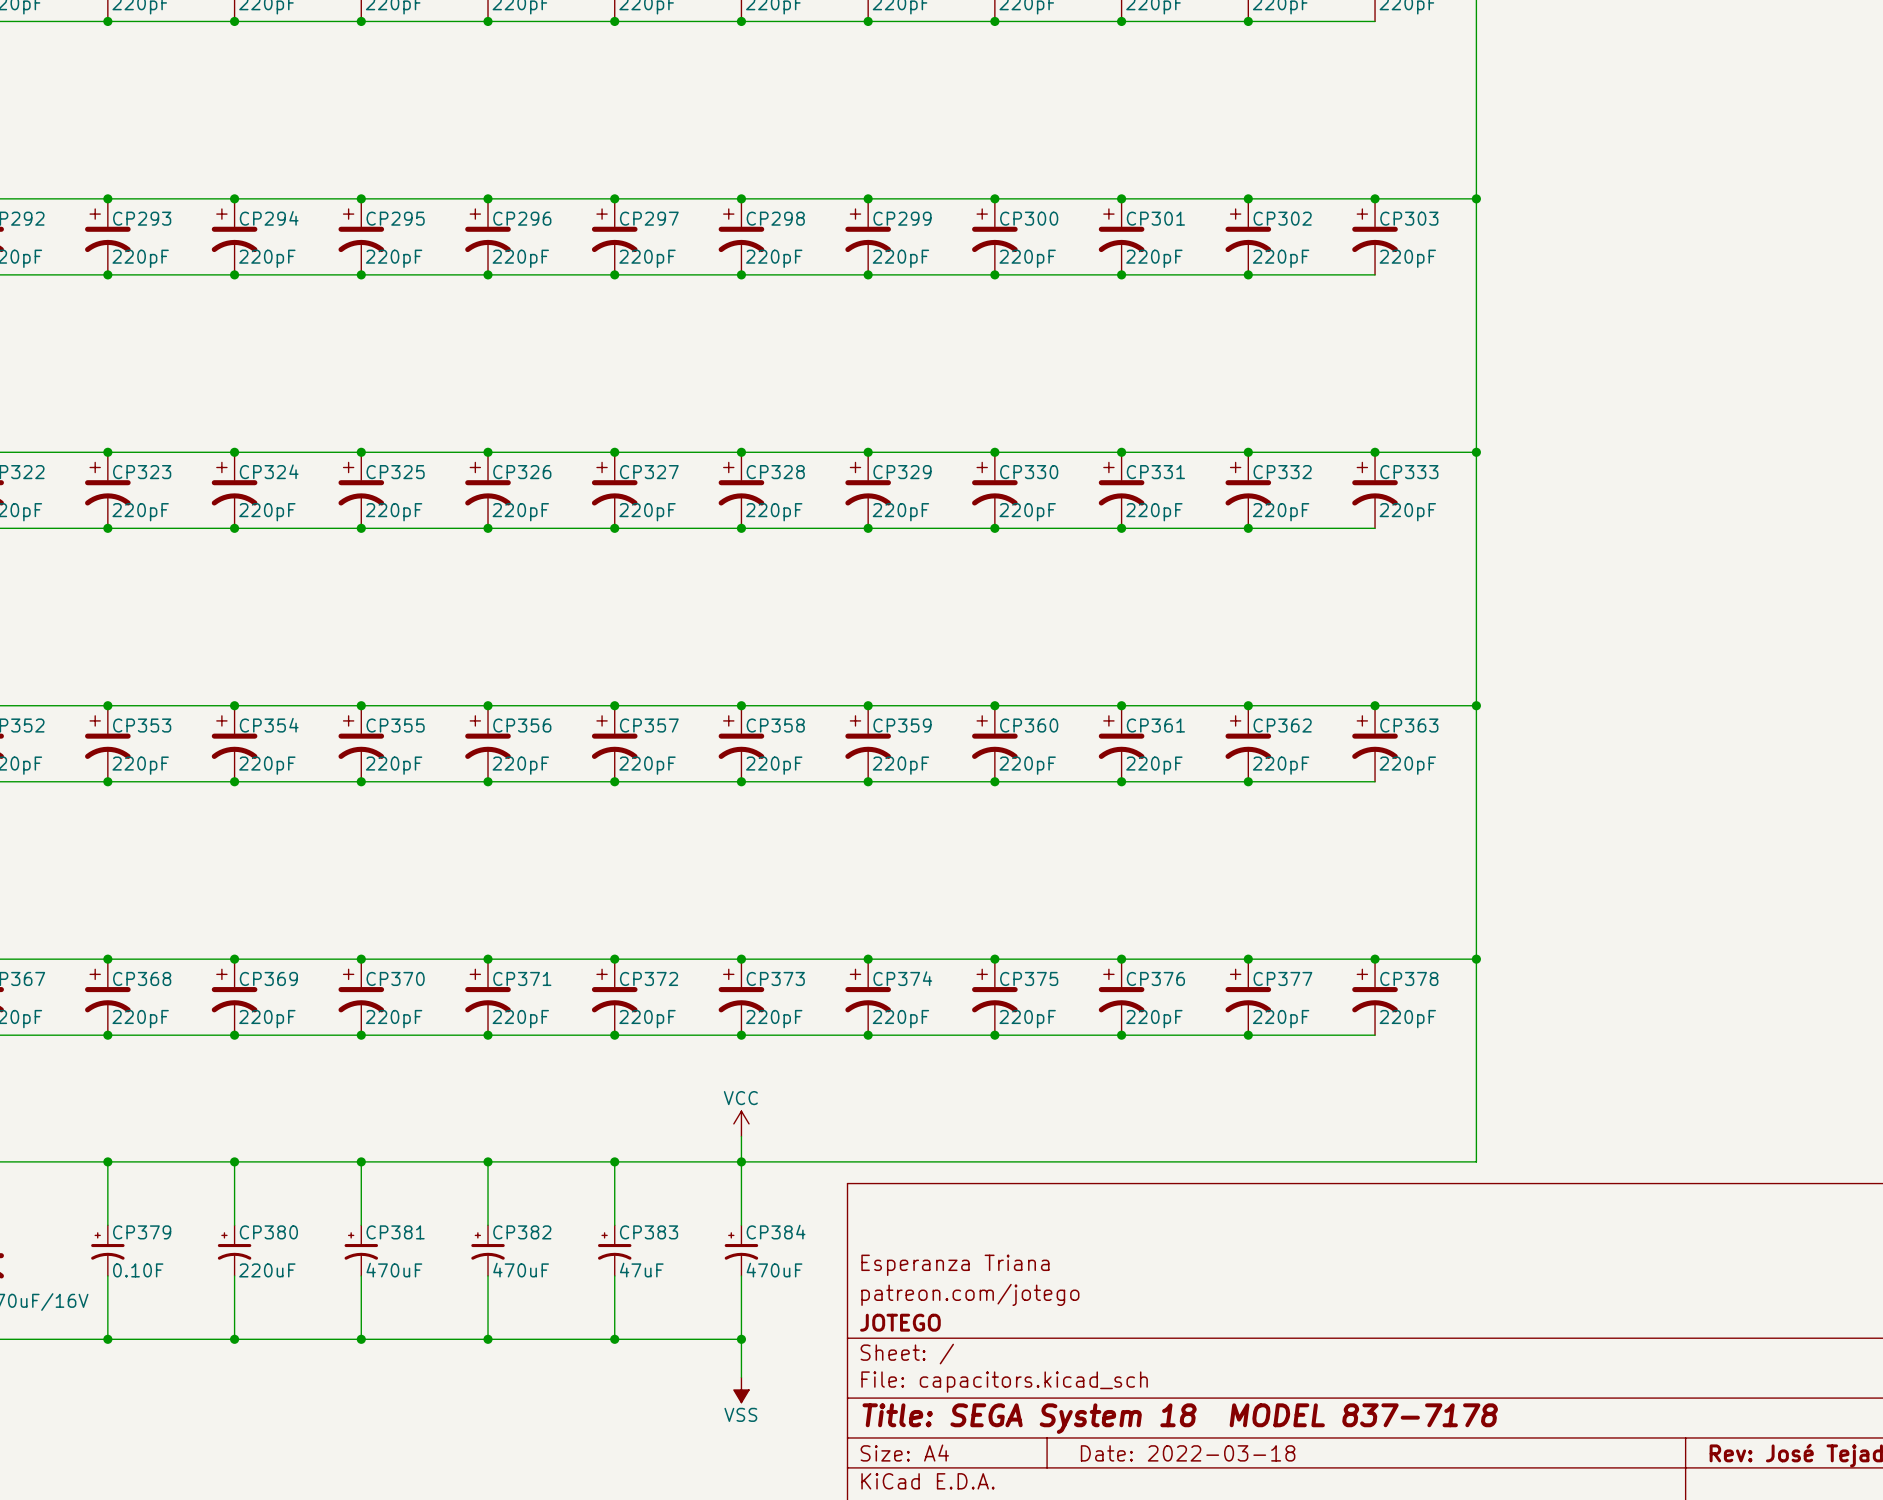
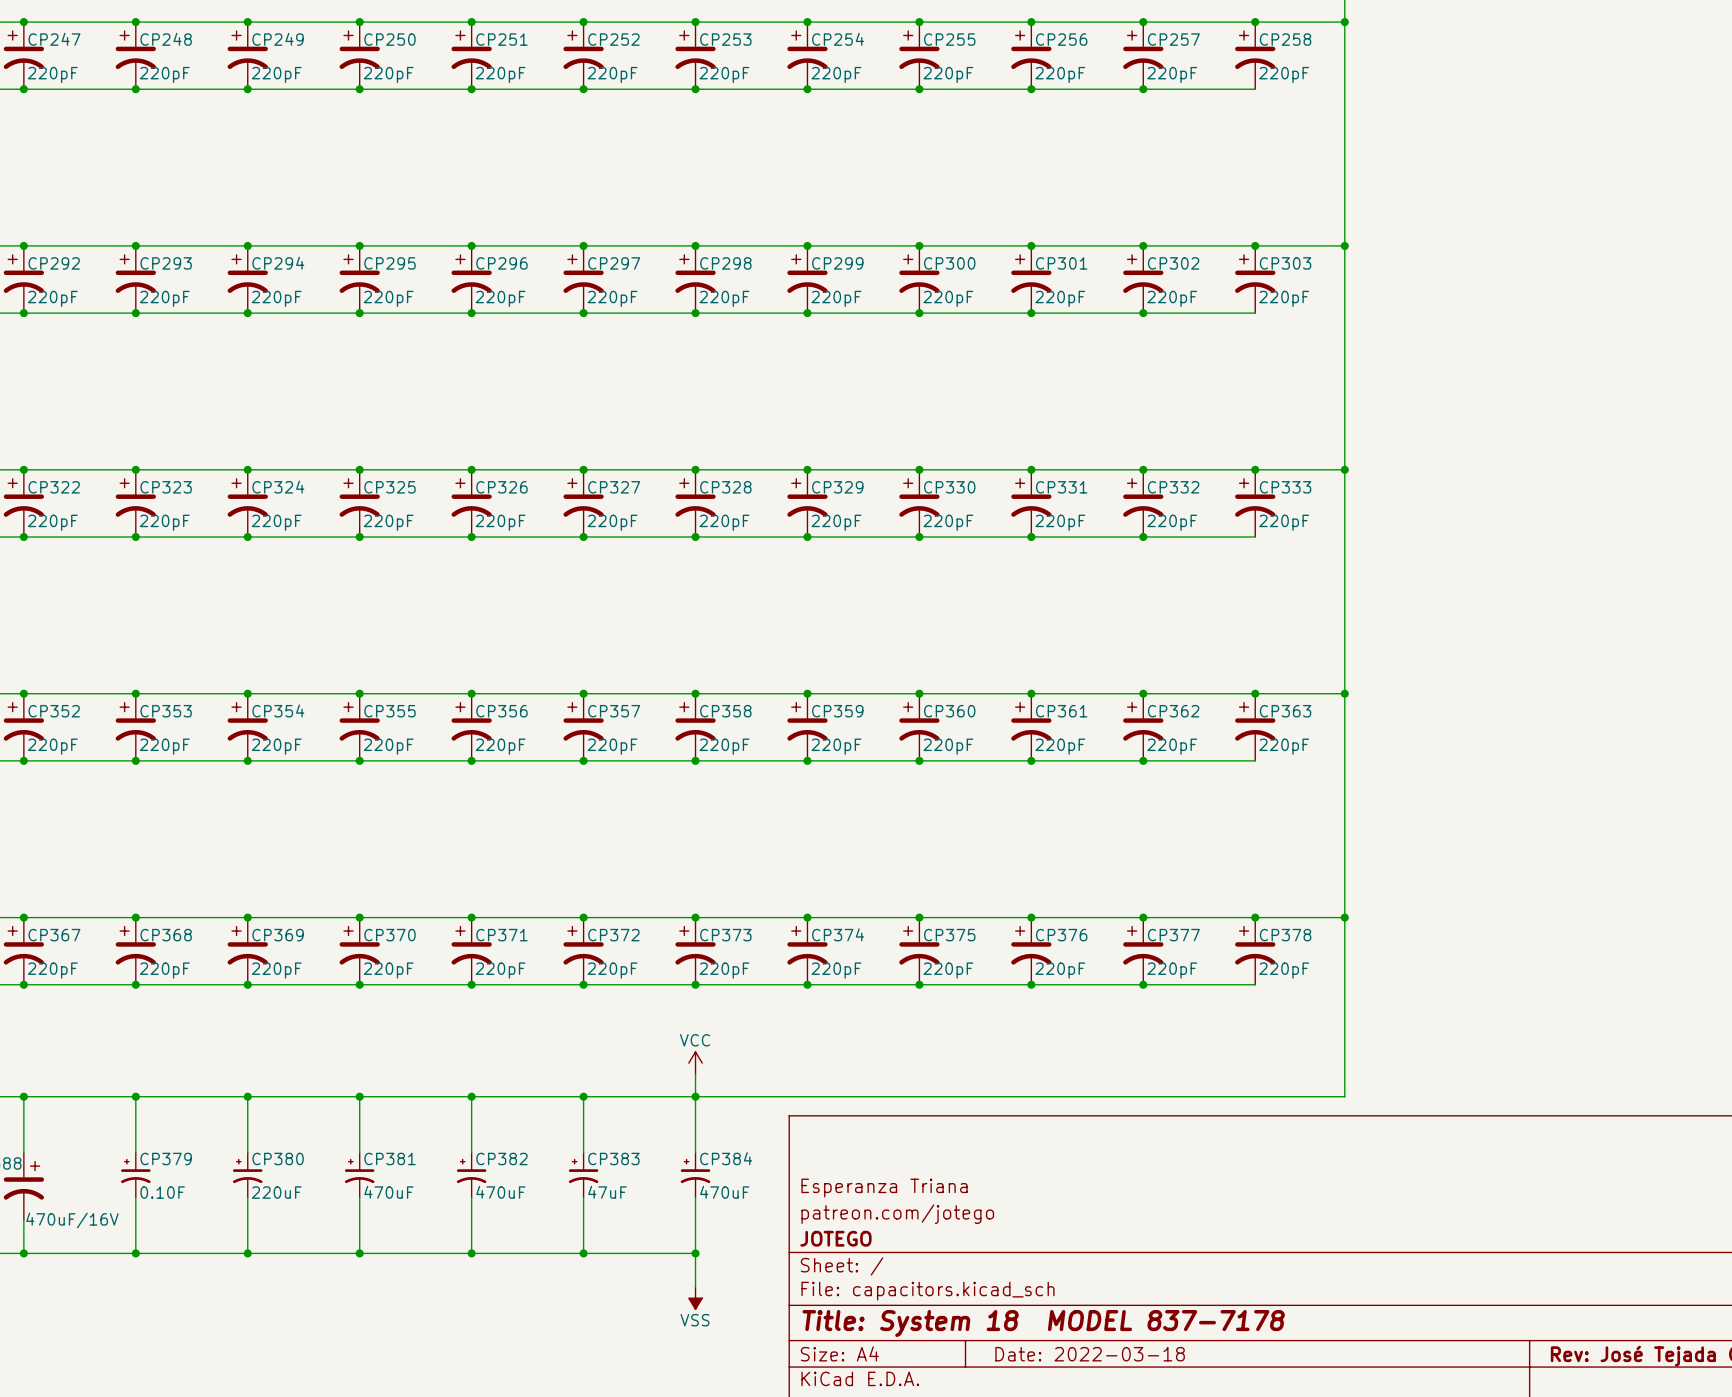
title block: Title: SEGA System 18 MODEL 837-7178 (1180, 1418) -> Title: System 18 MODEL 837-7178 (1043, 1323)

